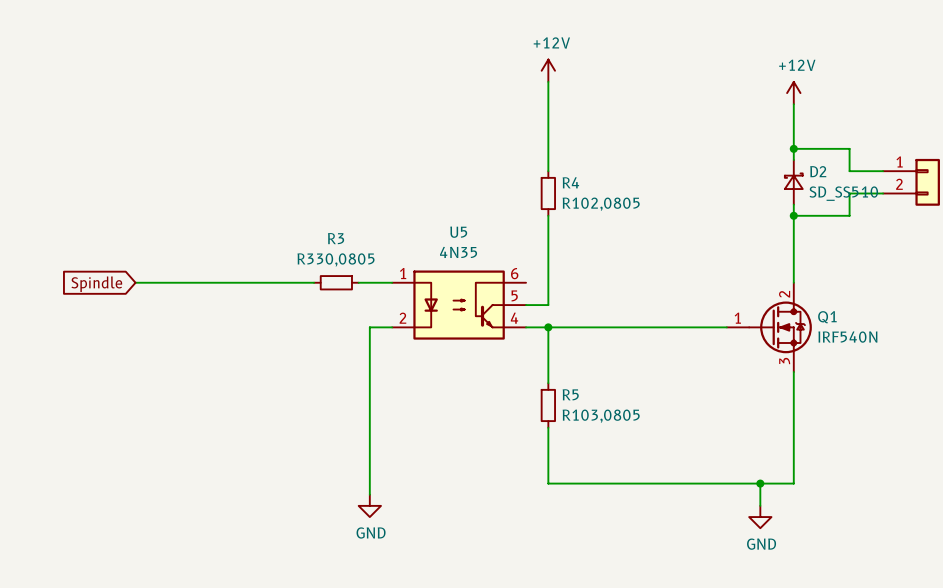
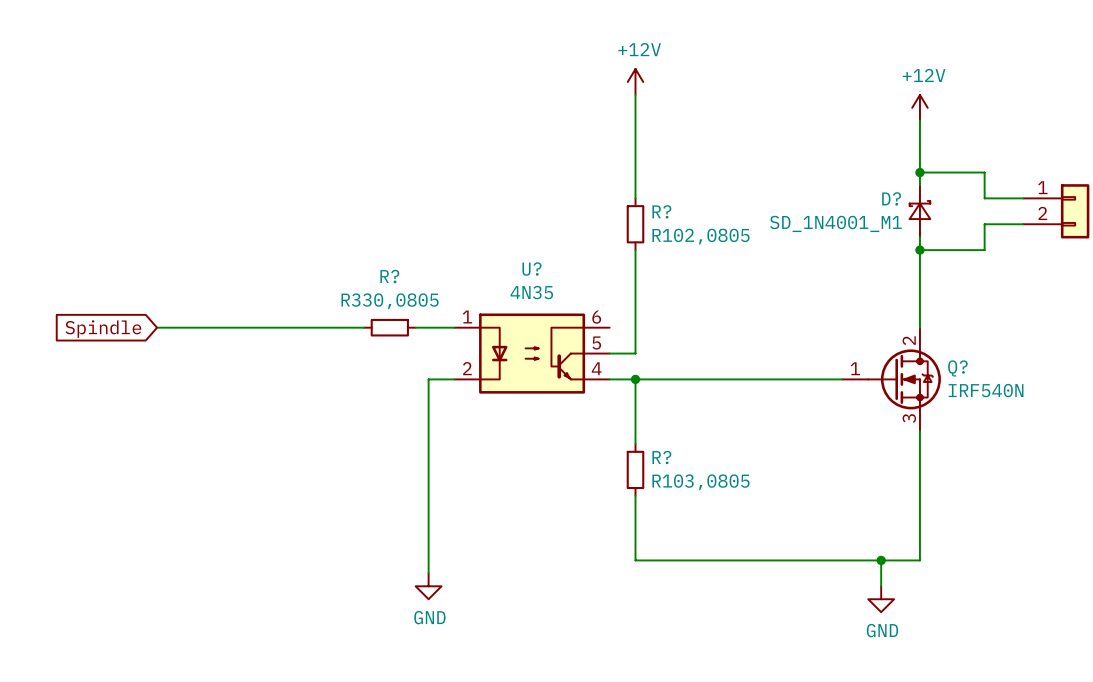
D2 name: D2 (818, 171) -> D? (891, 198)
R4 name: R4 (570, 182) -> R? (661, 211)
D2 value: SD_SS510 (843, 193) -> SD_1N4001_M1 (835, 223)
U5 name: U5 (458, 232) -> U? (531, 269)
R3 name: R3 (336, 238) -> R? (389, 276)
Q1 name: Q1 (827, 317) -> Q? (957, 368)
R5 name: R5 (570, 394) -> R? (661, 457)

